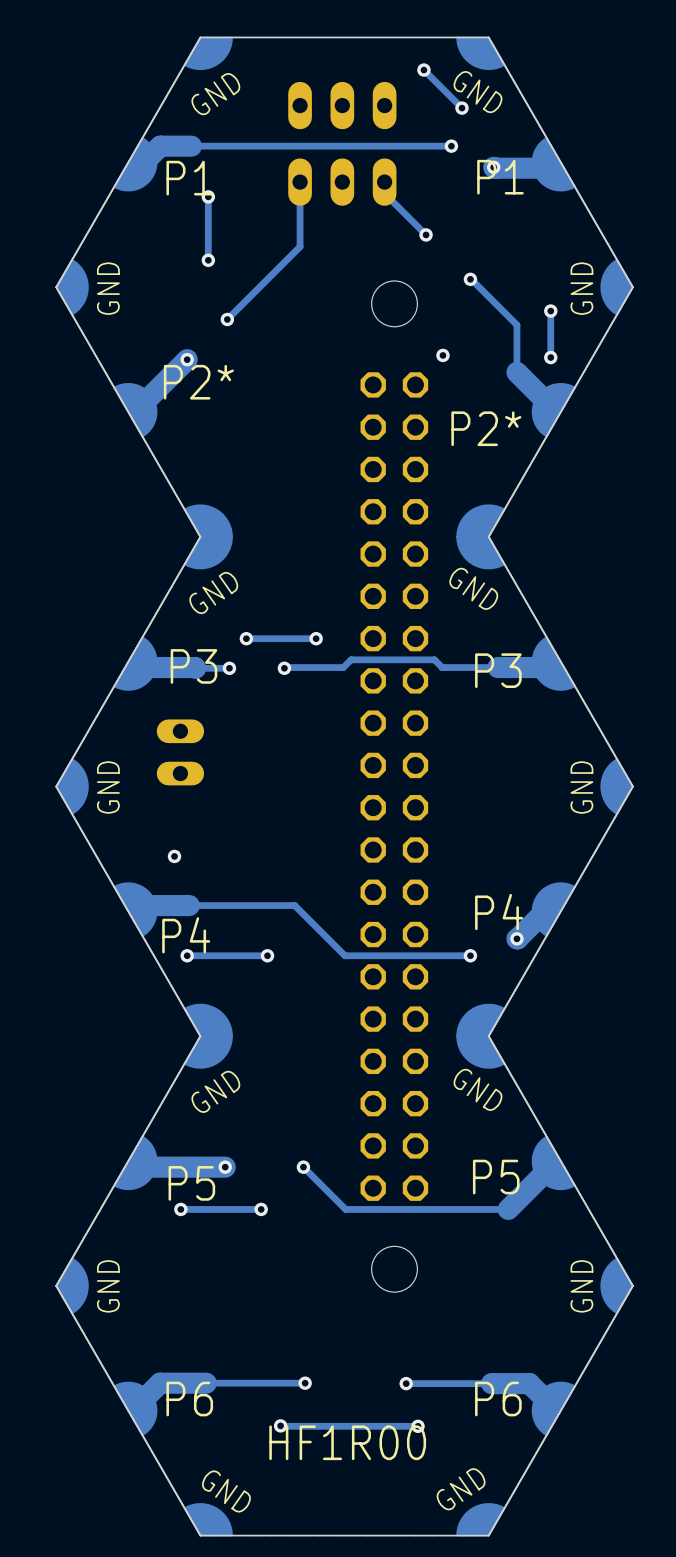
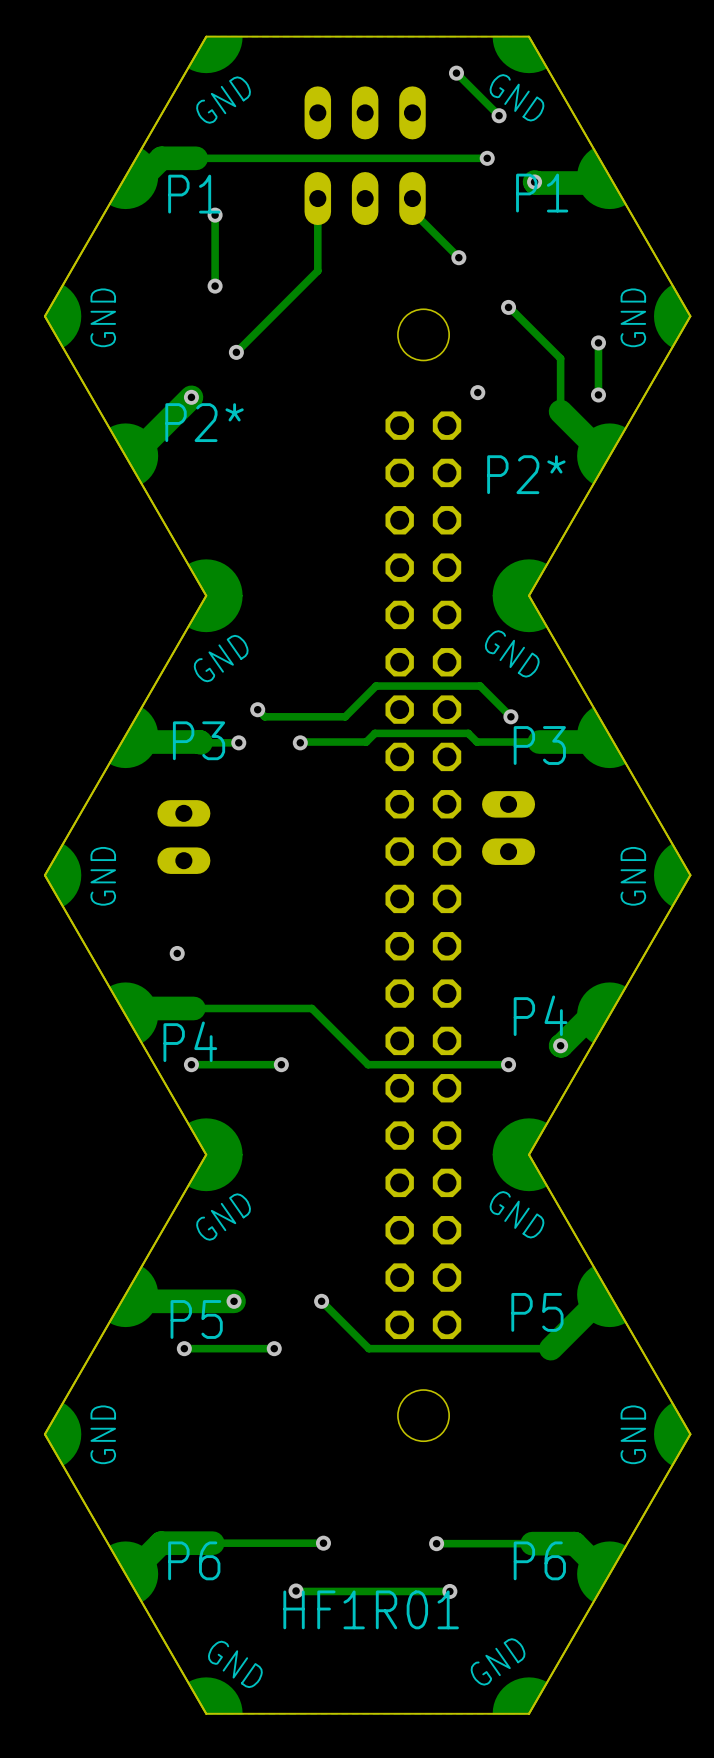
track: (316, 638) (246, 638) -> (510, 716) (480, 686) (376, 686) (345, 716) (264, 716) (257, 709)
via: (316, 638) -> none
via: none -> (510, 716)
part: none -> (508, 828)
text: HF1R00 (347, 1442) -> HF1R01 (371, 1609)

